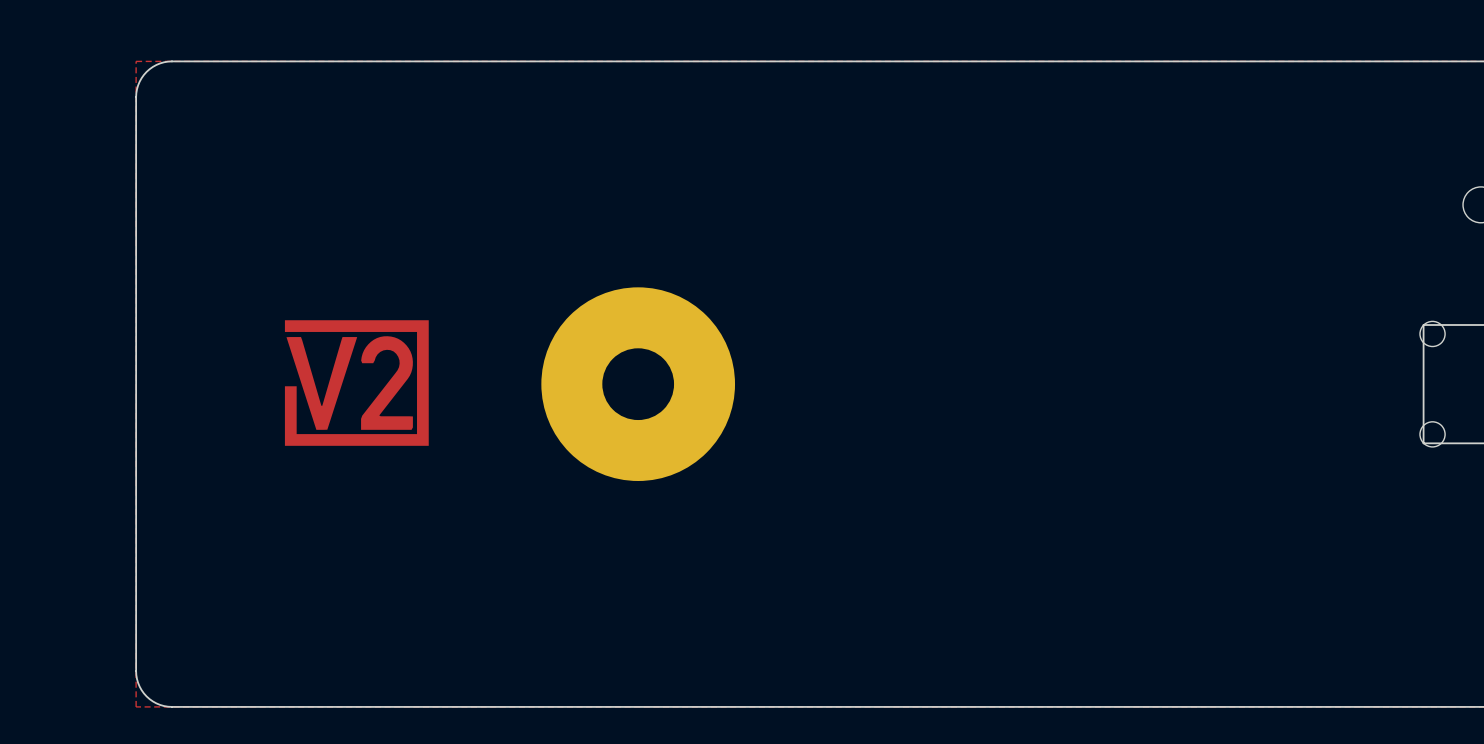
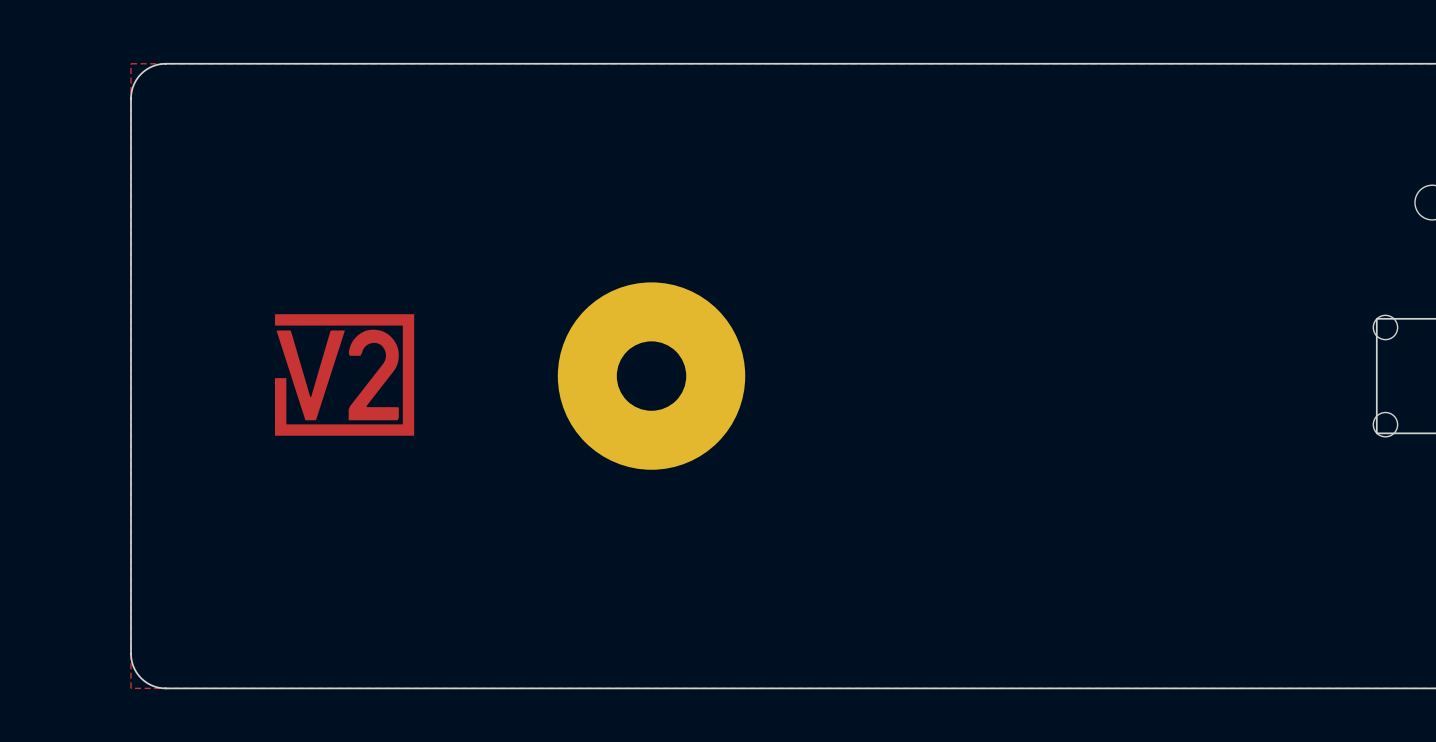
part position: (638, 384) -> (651, 376)

